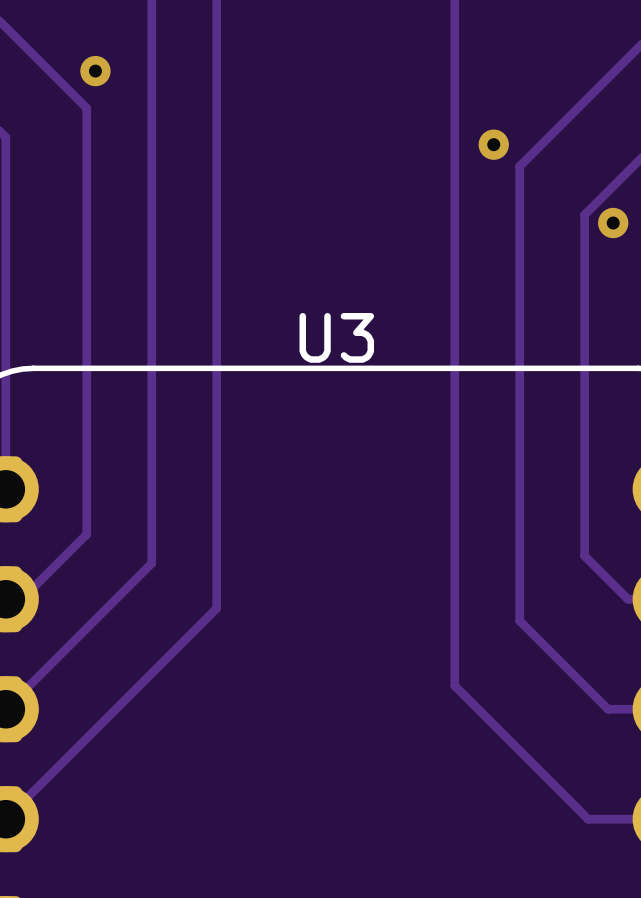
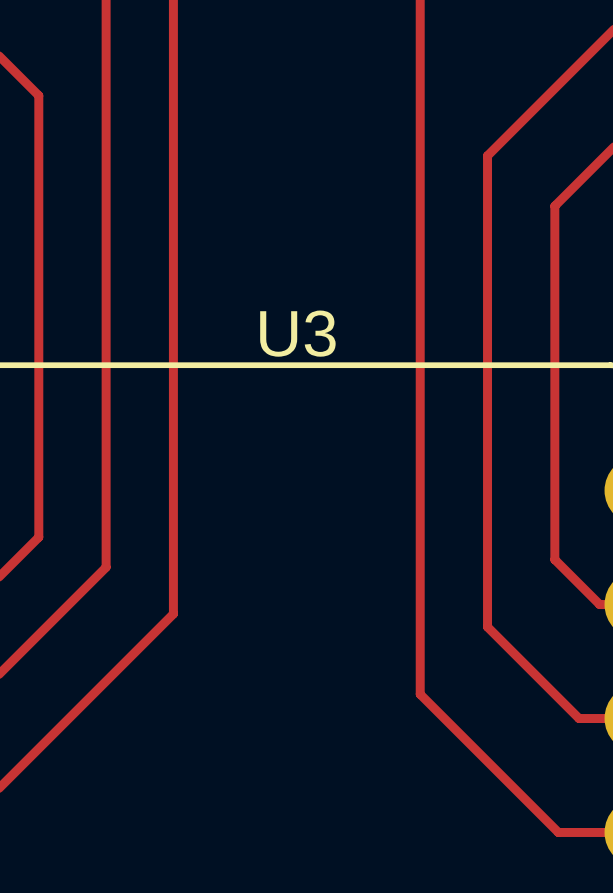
via: (95, 71) -> none
via: (493, 144) -> none
via: (613, 223) -> none

